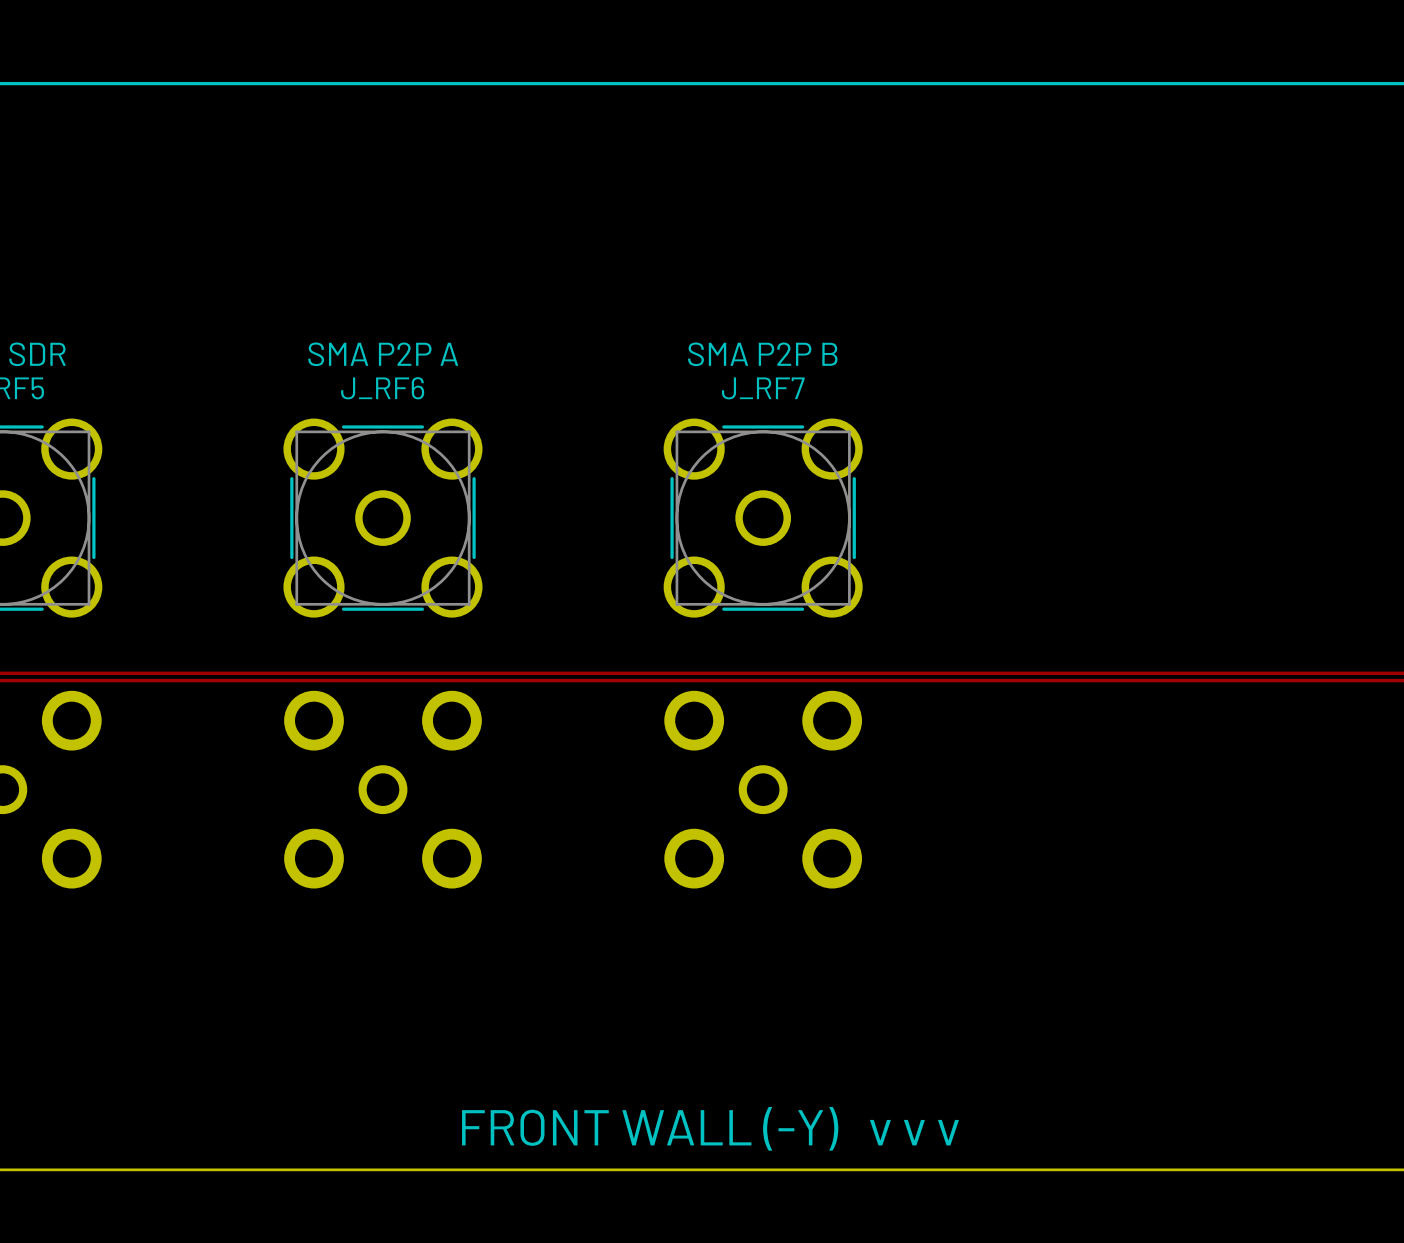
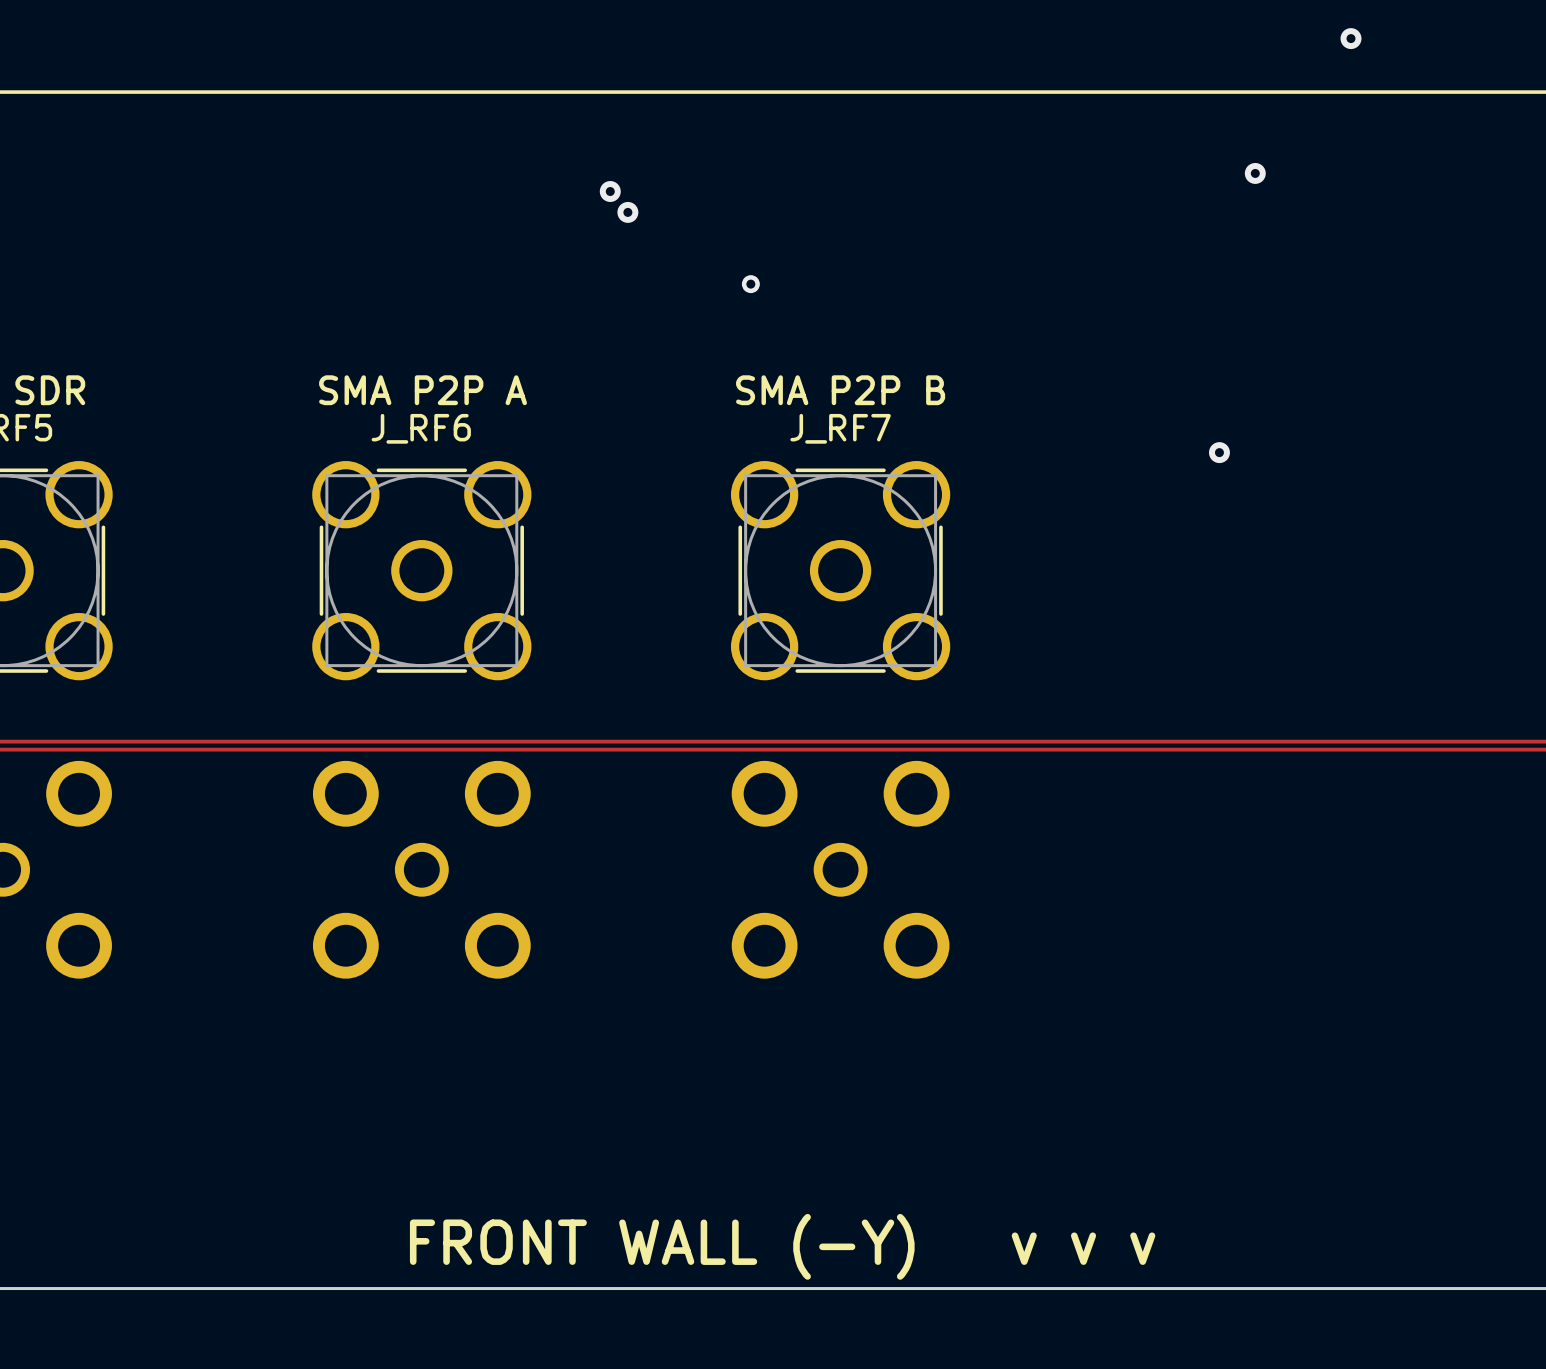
via: none -> (1351, 38)
via: none -> (1255, 173)
via: none -> (610, 191)
via: none -> (627, 212)
via: none -> (750, 284)
via: none -> (1219, 452)

